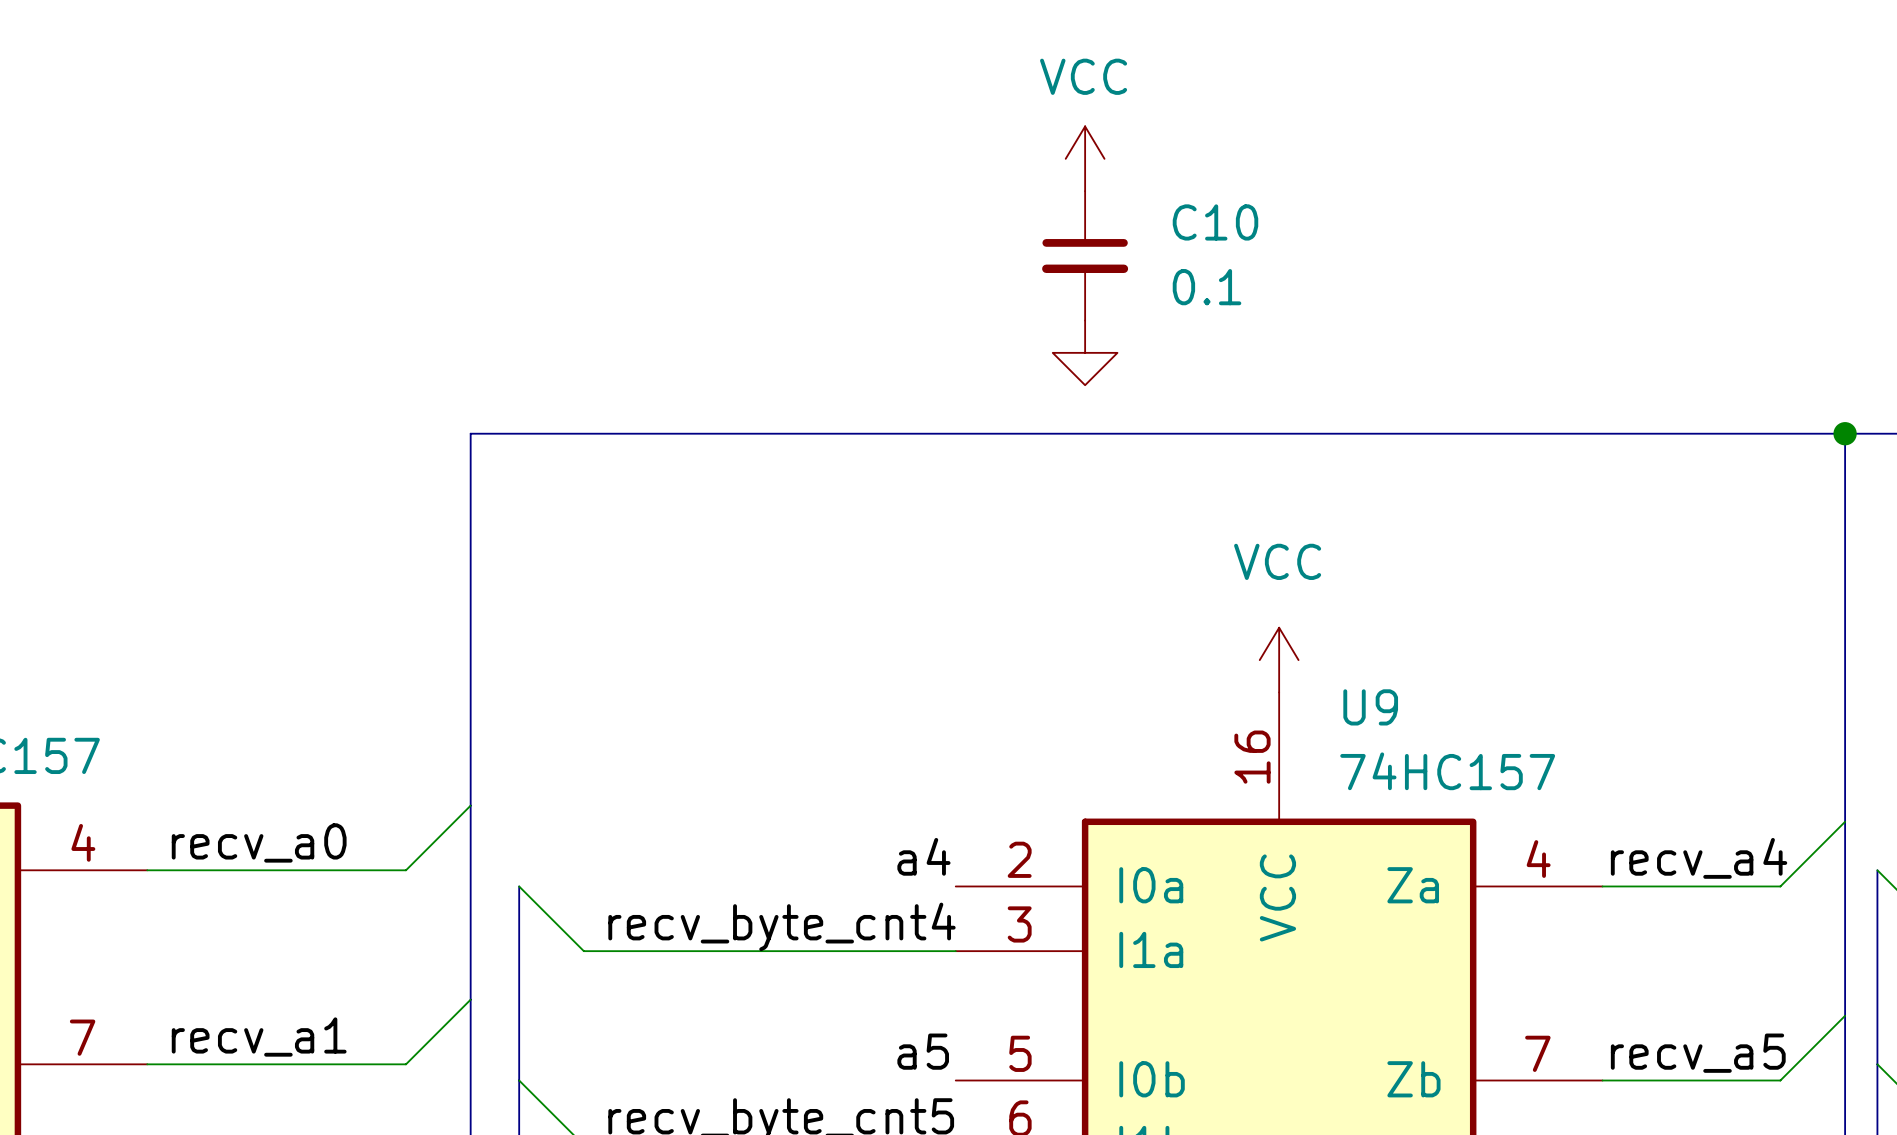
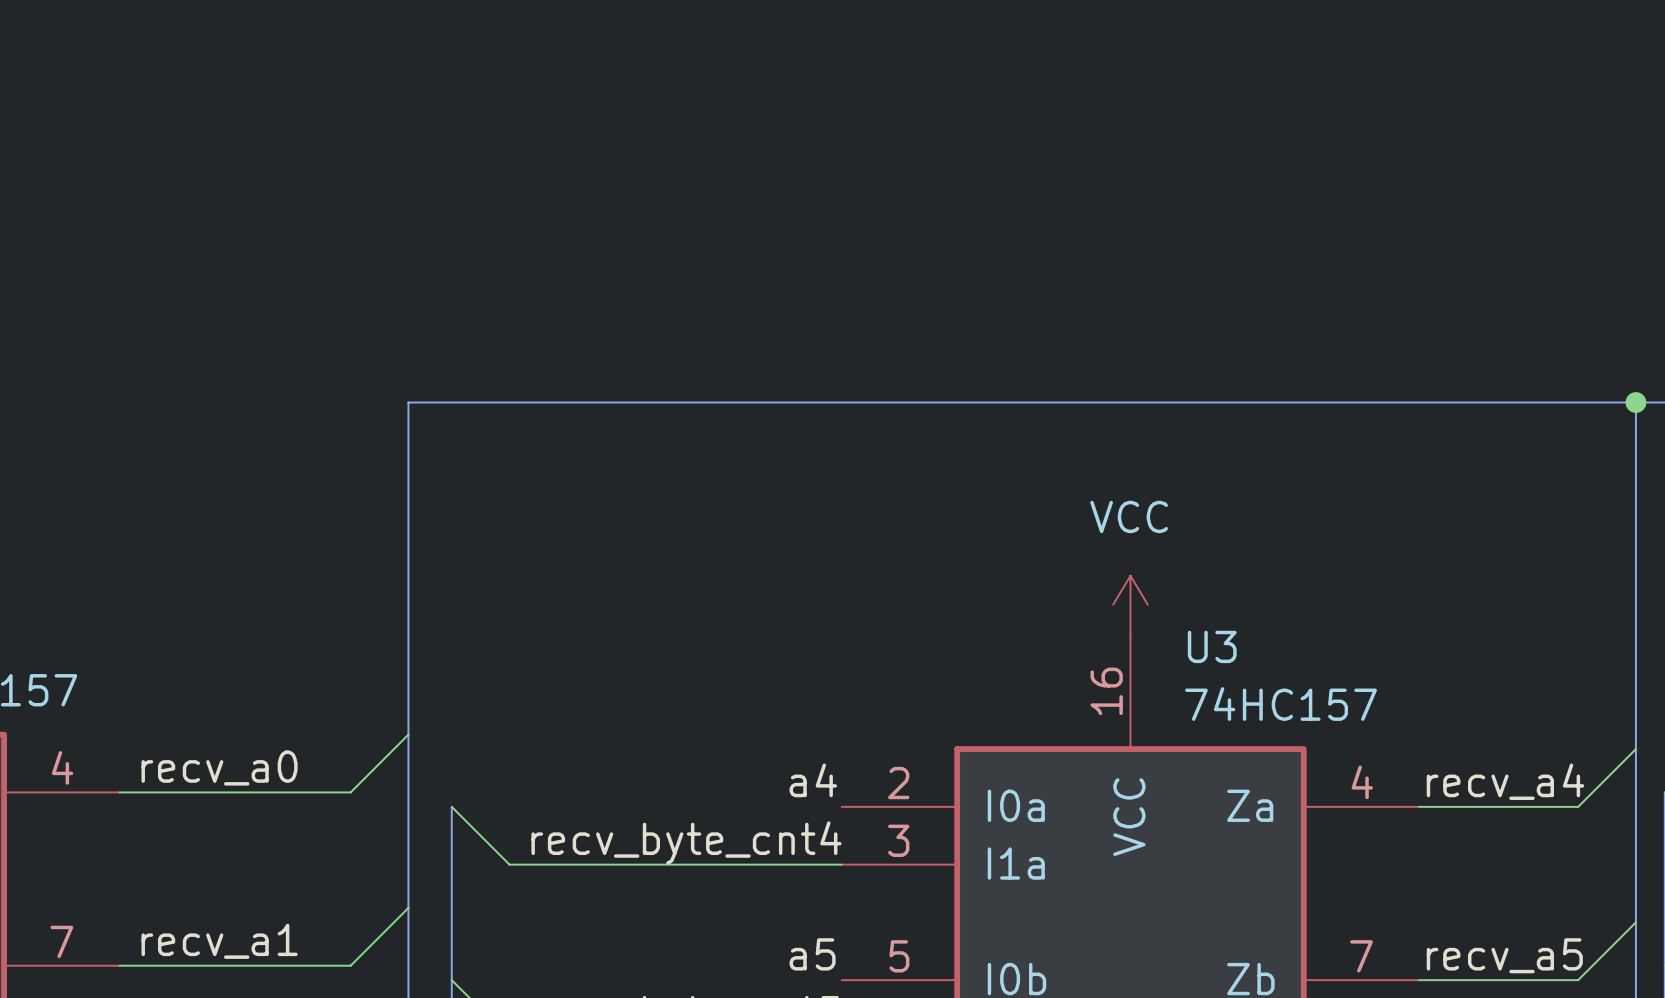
power symbol: VCC (1085, 158) -> none
C10: 0.1 (1085, 255) -> none
power symbol: (1085, 352) -> none
U9 name: U9 (1370, 707) -> U3 (1212, 646)

